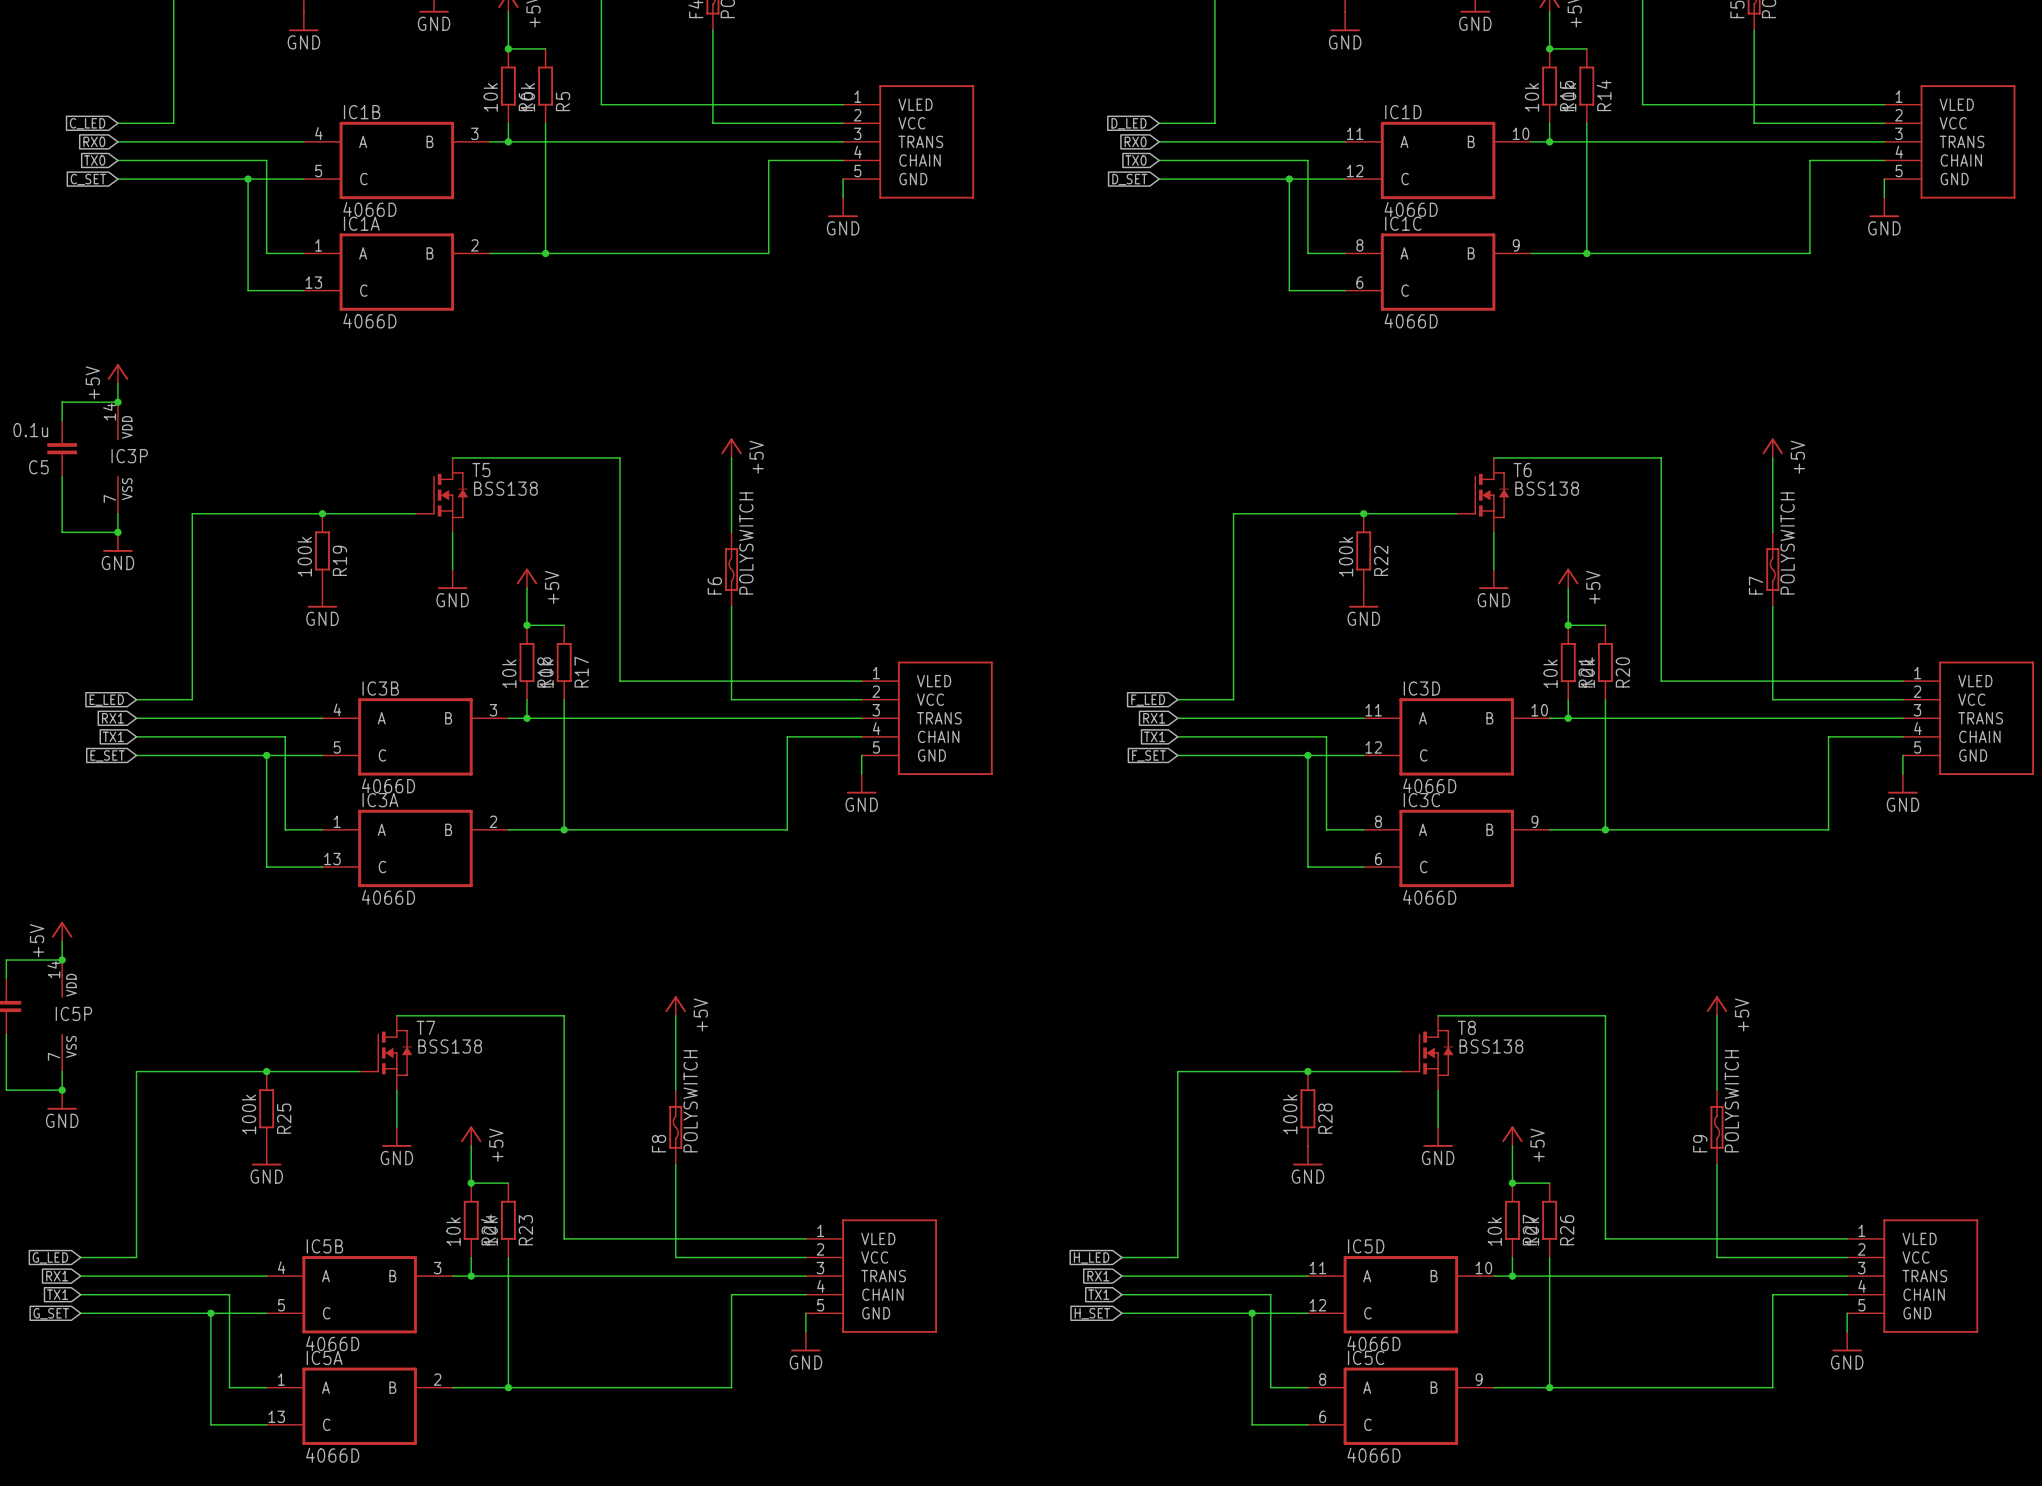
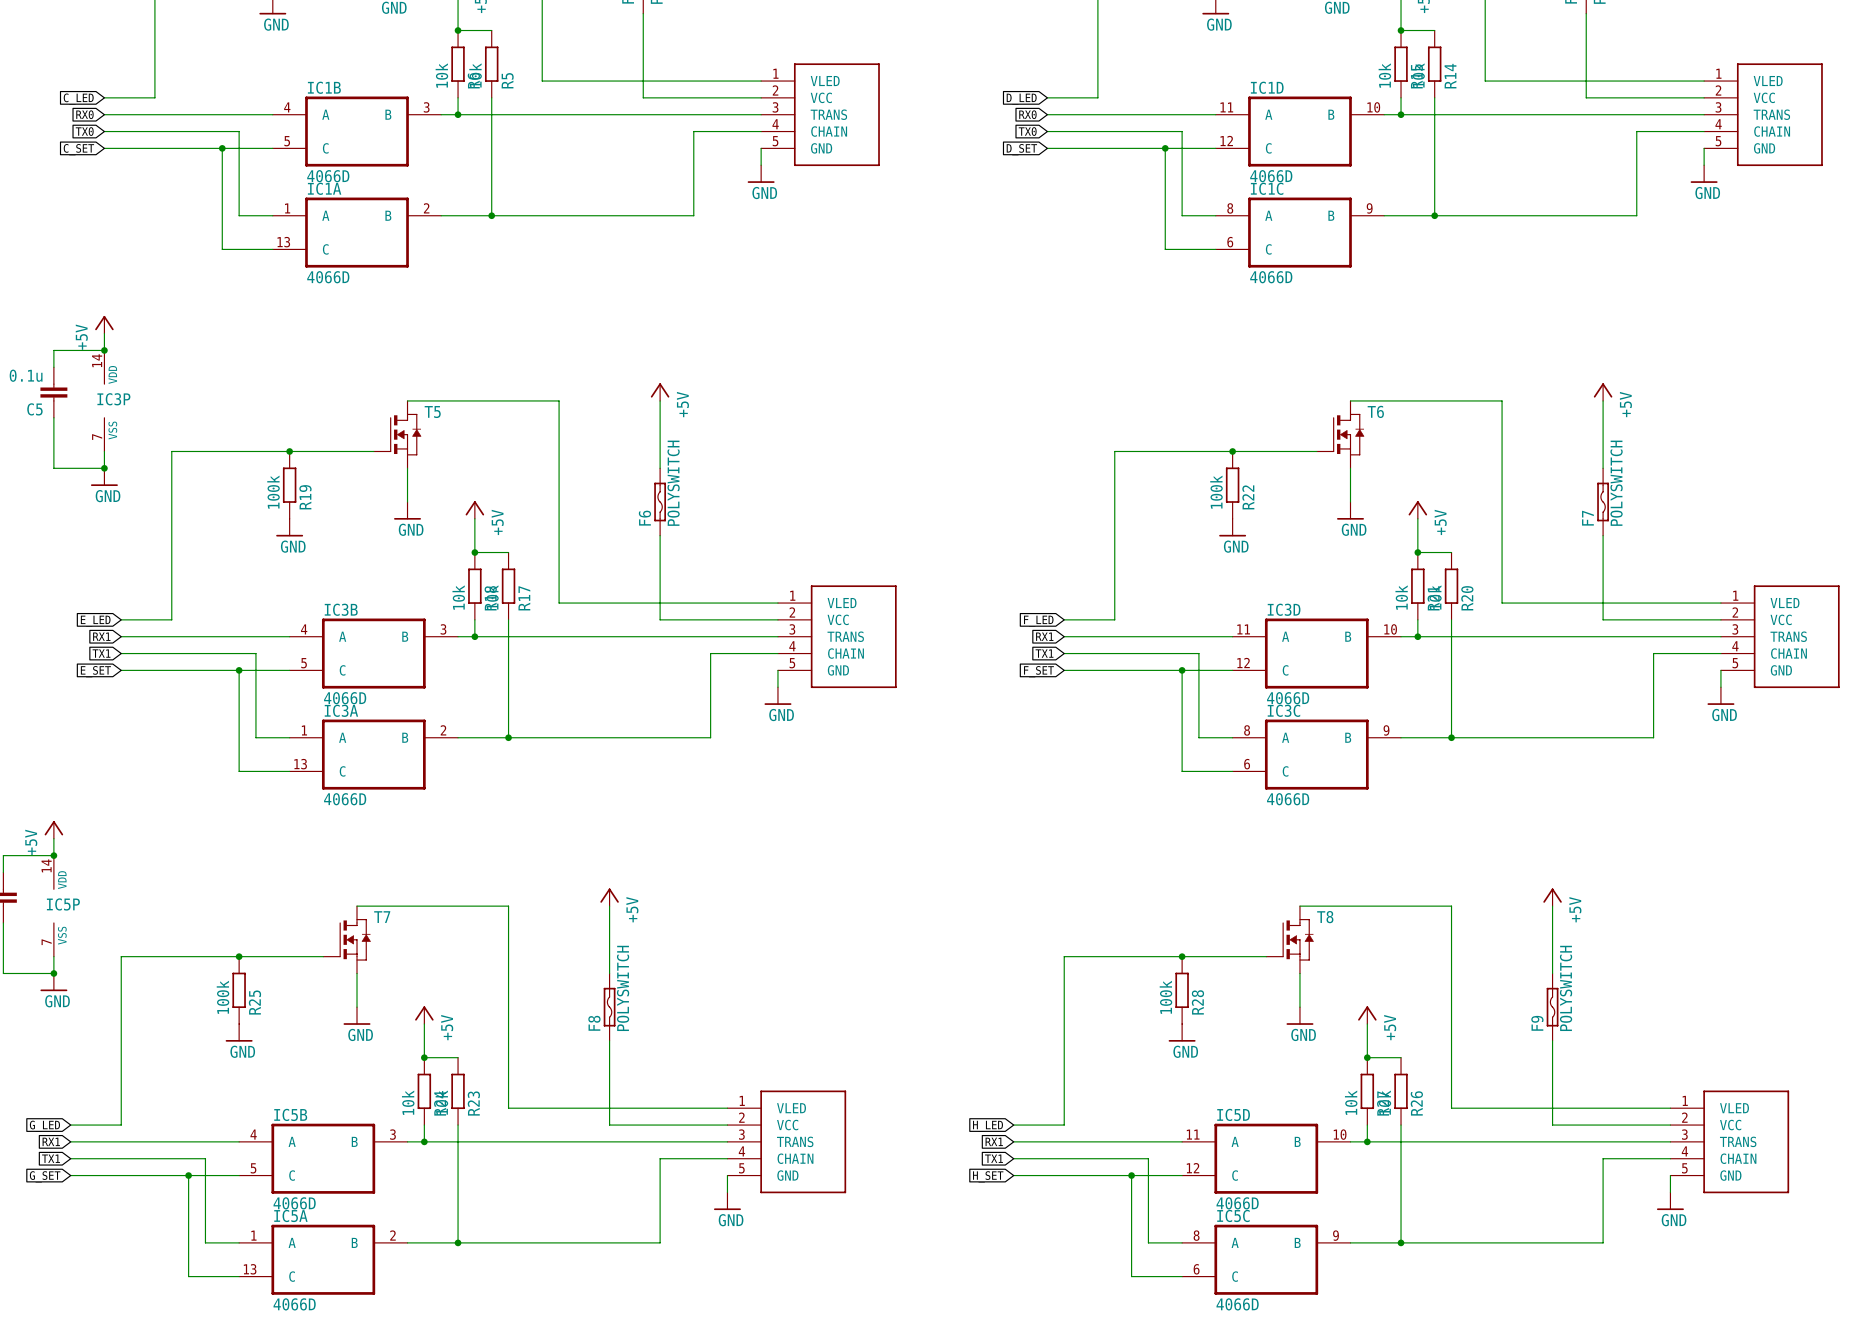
T5 value: BSS138 (505, 488) -> none
T6 value: BSS138 (1547, 488) -> none
T7 value: BSS138 (450, 1046) -> none
T8 value: BSS138 (1491, 1046) -> none

